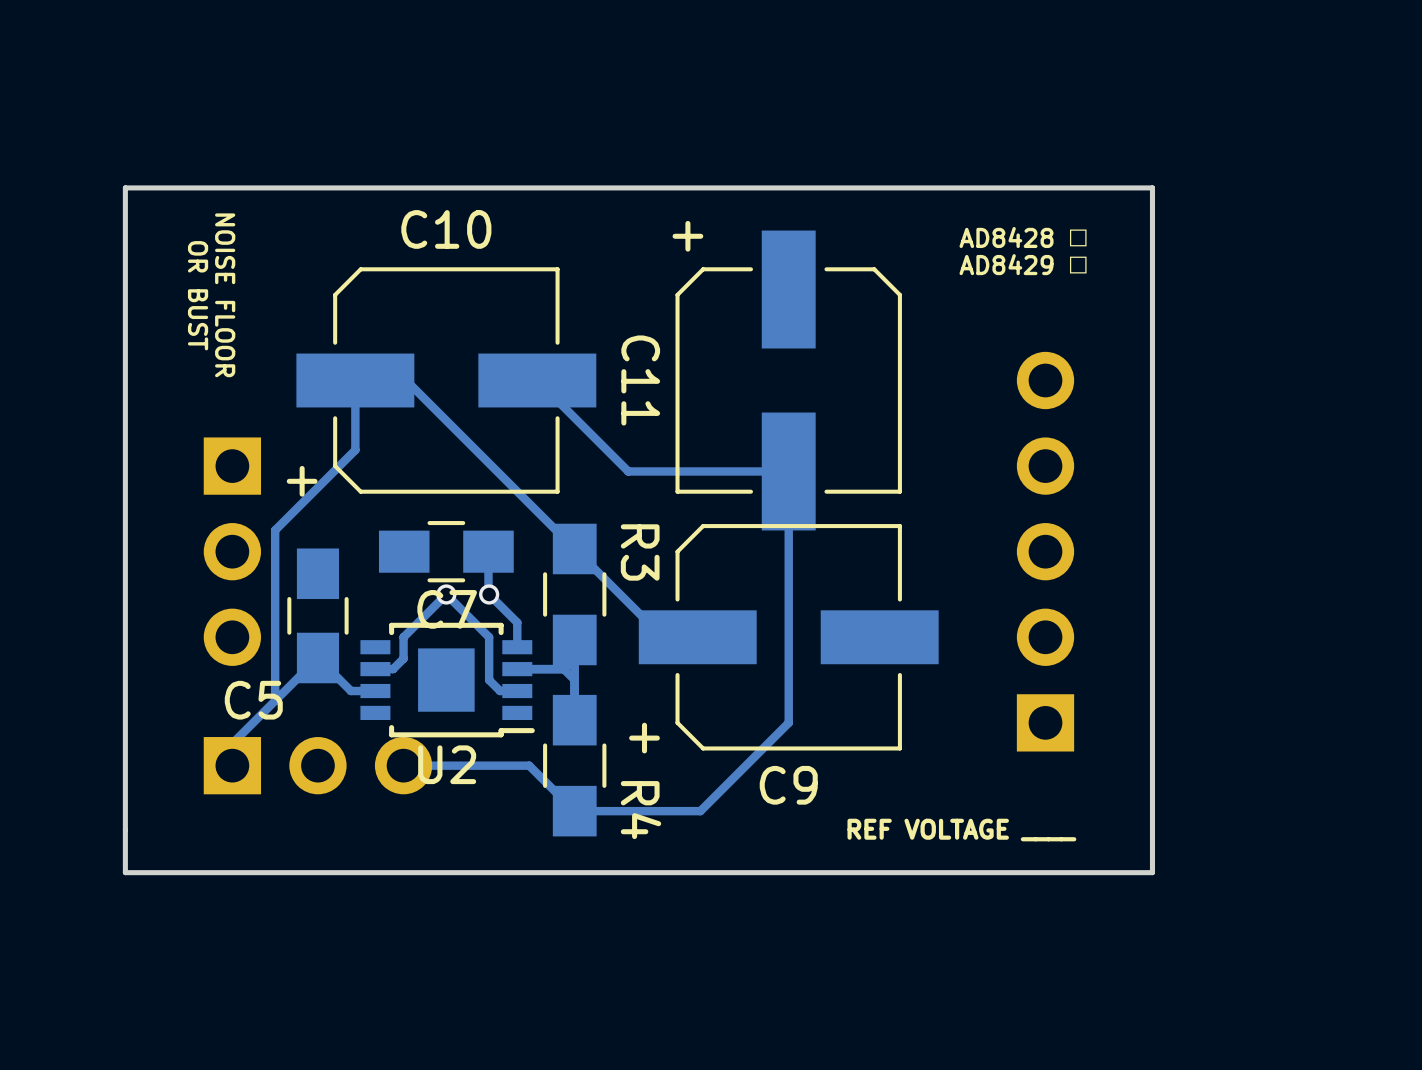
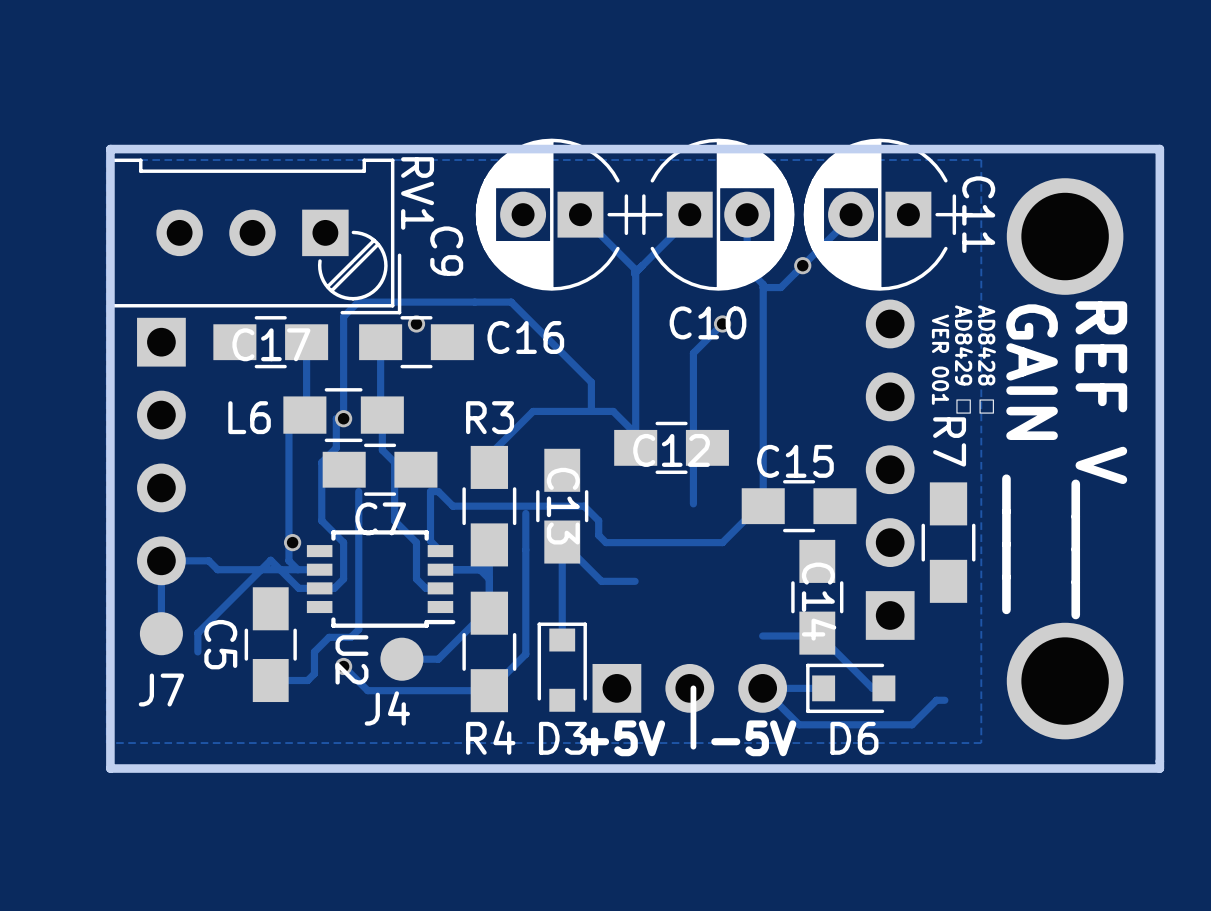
board edge: (1152, 187) (1152, 872) (125, 872) (125, 187) (1152, 187) -> (1159, 149) (1159, 768) (110, 768) (110, 149) (1159, 149)
C10 name position: C10 (446, 229) -> C10 (708, 322)
C11 footprint: [675, 230, 902, 531] -> [803, 138, 974, 291]
text rotation: 0° (1023, 237) -> 90° clockwise (987, 360)
text position: AD8428 ☐ (1023, 237) -> AD8428 ☐ (987, 360)
track: none -> (689, 214) (689, 218) (634, 273) (634, 268) (580, 214)
track: none -> (851, 214) (851, 217) (780, 287) (763, 287)
text rotation: 0° (1023, 264) -> 90° clockwise (963, 360)
text position: AD8429 ☐ (1023, 264) -> AD8429 ☐ (963, 360)
C10 footprint: [296, 267, 597, 494] -> [624, 138, 795, 291]
RV1: none -> (255, 236)
part: none -> (1065, 236)
text: OR BUST (198, 295) -> none
text: NOISE FLOOR (225, 295) -> none
via: none -> (802, 265)
track: none -> (635, 272) (635, 447)
via: none -> (416, 323)
track: (537, 380) (628, 471) (788, 471) (788, 722) (700, 811) (574, 811) (529, 765) (403, 765) -> none
C11 name position: C11 (640, 380) -> C11 (978, 214)
track: none -> (722, 323) (693, 353) (693, 503)
via: none -> (722, 323)
part: none -> (270, 342)
track: none -> (306, 342) (306, 413) (304, 415) (288, 415) (288, 560) (297, 569)
track: none -> (380, 342) (380, 413)
C16: none -> (416, 342)
text: none -> VER 001 (940, 359)
track: none -> (591, 411) (591, 382) (511, 302) (358, 302) (343, 316) (343, 418) (336, 418) (336, 447) (321, 462) (321, 520) (343, 542)
L6: none -> (343, 415)
via: none -> (343, 418)
track: none -> (635, 433) (613, 411) (533, 411) (489, 455) (489, 467)
C9 footprint: [638, 524, 939, 751] -> [475, 138, 646, 291]
part: none -> (671, 447)
part: none -> (161, 451)
text: none -> GAIN ____ (1030, 459)
text: none -> REF V____ (1099, 460)
part: (232, 551) -> none
track: (488, 551) (488, 593) (517, 622) (517, 647) -> (747, 214) (747, 268) (763, 284) (763, 506) (759, 506) (722, 542) (605, 542) (598, 535) (598, 520) (584, 506) (452, 506) (438, 491) (430, 491) (430, 541) (440, 551)
R3 name rotation: 0° (640, 552) -> 90° counterclockwise (490, 417)
R3 name position: R3 (640, 552) -> R3 (490, 417)
track: none -> (358, 491) (358, 629) (350, 637) (329, 637) (314, 651) (314, 673) (307, 680) (270, 680)
via: (446, 594) -> none
via: (489, 594) -> none
part: none -> (562, 506)
C15: none -> (799, 506)
track: none -> (525, 513) (525, 654) (489, 690) (367, 690) (343, 666)
track: (463, 611) (446, 594) (403, 637) -> (394, 520) (394, 462) (382, 450) (382, 415)
C5 position: (317, 615) -> (270, 644)
U2 footprint: [360, 622, 535, 738] -> [306, 530, 456, 628]
via: none -> (292, 542)
track: (697, 637) (663, 637) (406, 380) (355, 380) (355, 450) (275, 530) (275, 700) -> none
R7: none -> (948, 542)
track: (403, 658) (393, 669) (375, 669) -> (343, 560) (343, 579) (334, 588) (319, 588)
track: none -> (319, 569) (217, 569) (208, 560) (161, 560) (161, 633)
track: none -> (635, 581) (601, 581) (562, 542) (562, 640)
C5 name rotation: 0° (253, 700) -> 90° clockwise (220, 644)
part: none -> (817, 597)
track: none -> (489, 613) (484, 613) (438, 659) (401, 659)
J7: none -> (161, 633)
track: none -> (762, 636) (820, 636) (872, 688) (883, 688)
part: (317, 765) -> none
J4: none -> (401, 659)
via: none -> (343, 666)
D3: none -> (562, 667)
C9 name position: C9 (788, 785) -> C9 (446, 251)
part: none -> (1065, 681)
part: none -> (689, 688)
line: none -> (693, 688) (693, 746)
track: none -> (823, 688) (762, 688) (799, 724) (912, 724) (936, 700) (944, 700)
D6: none -> (850, 688)
R4 name rotation: 0° (641, 810) -> 90° counterclockwise (490, 737)
R4 name position: R4 (641, 810) -> R4 (490, 737)
text: REF VOLTAGE ____ (961, 830) -> none
text: none -> +5V (622, 738)
text: none -> -5V (753, 738)

